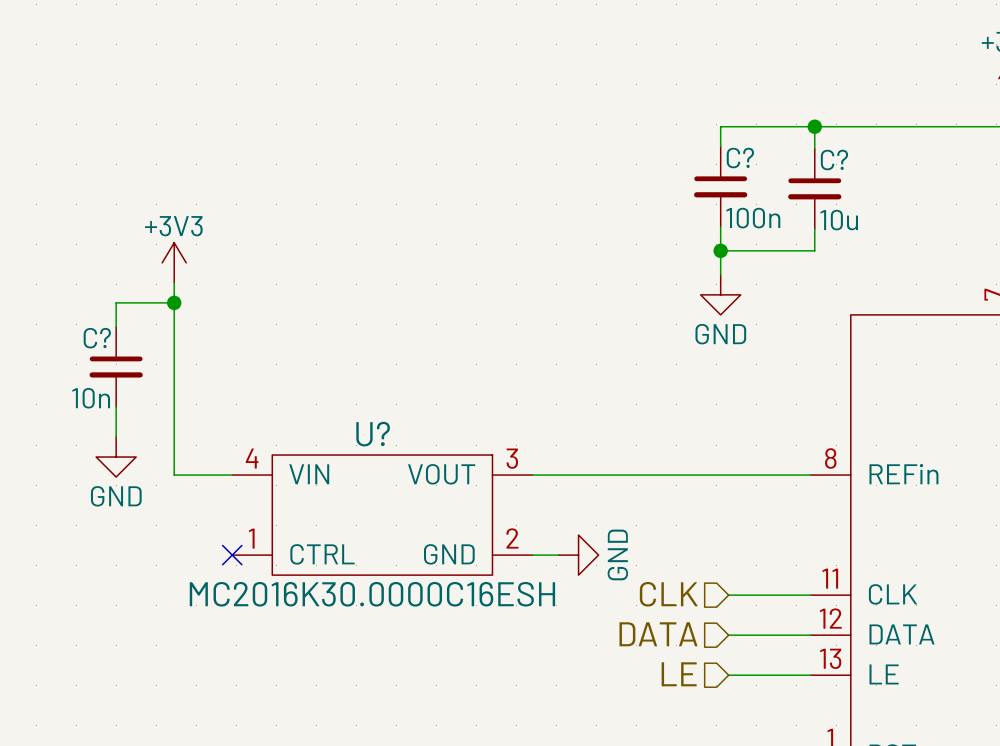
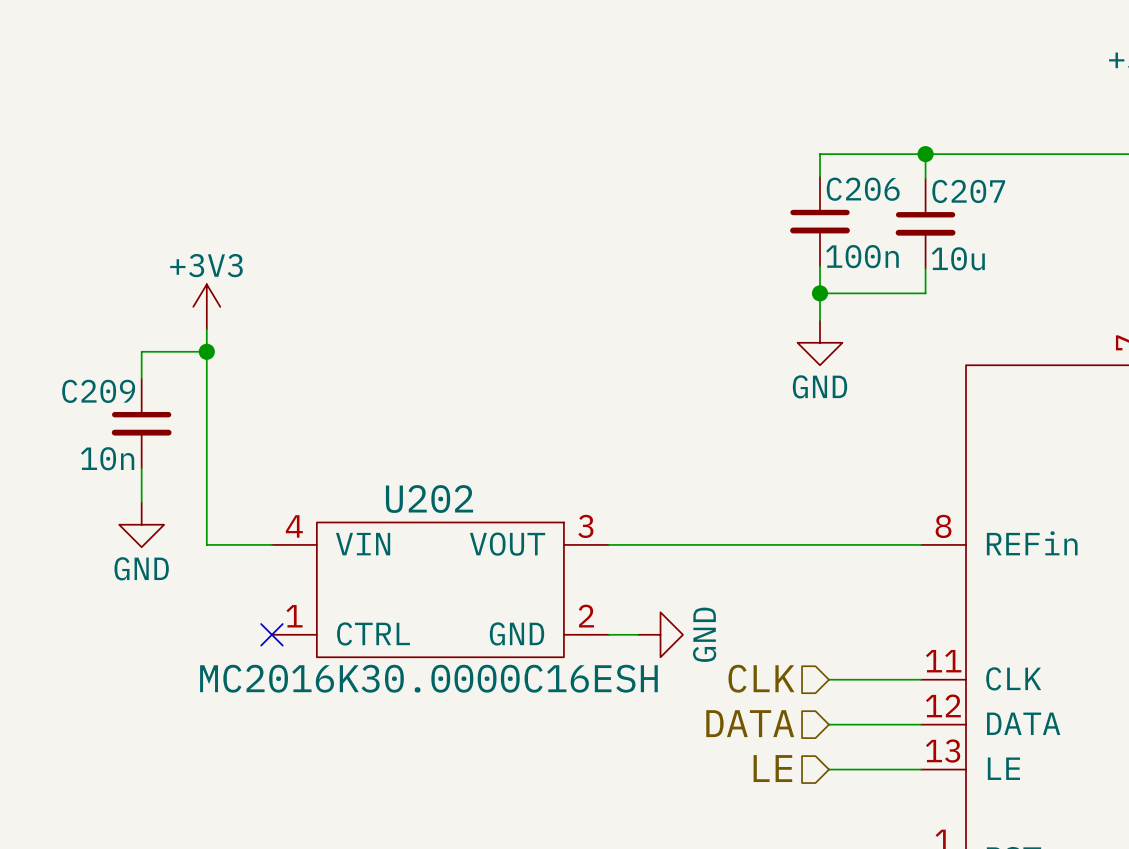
C? name: C? (740, 158) -> C206 (863, 189)
C? name: C? (834, 160) -> C207 (968, 191)
C? name: C? (97, 338) -> C209 (98, 391)
U? name: U? (373, 434) -> U202 (429, 499)

